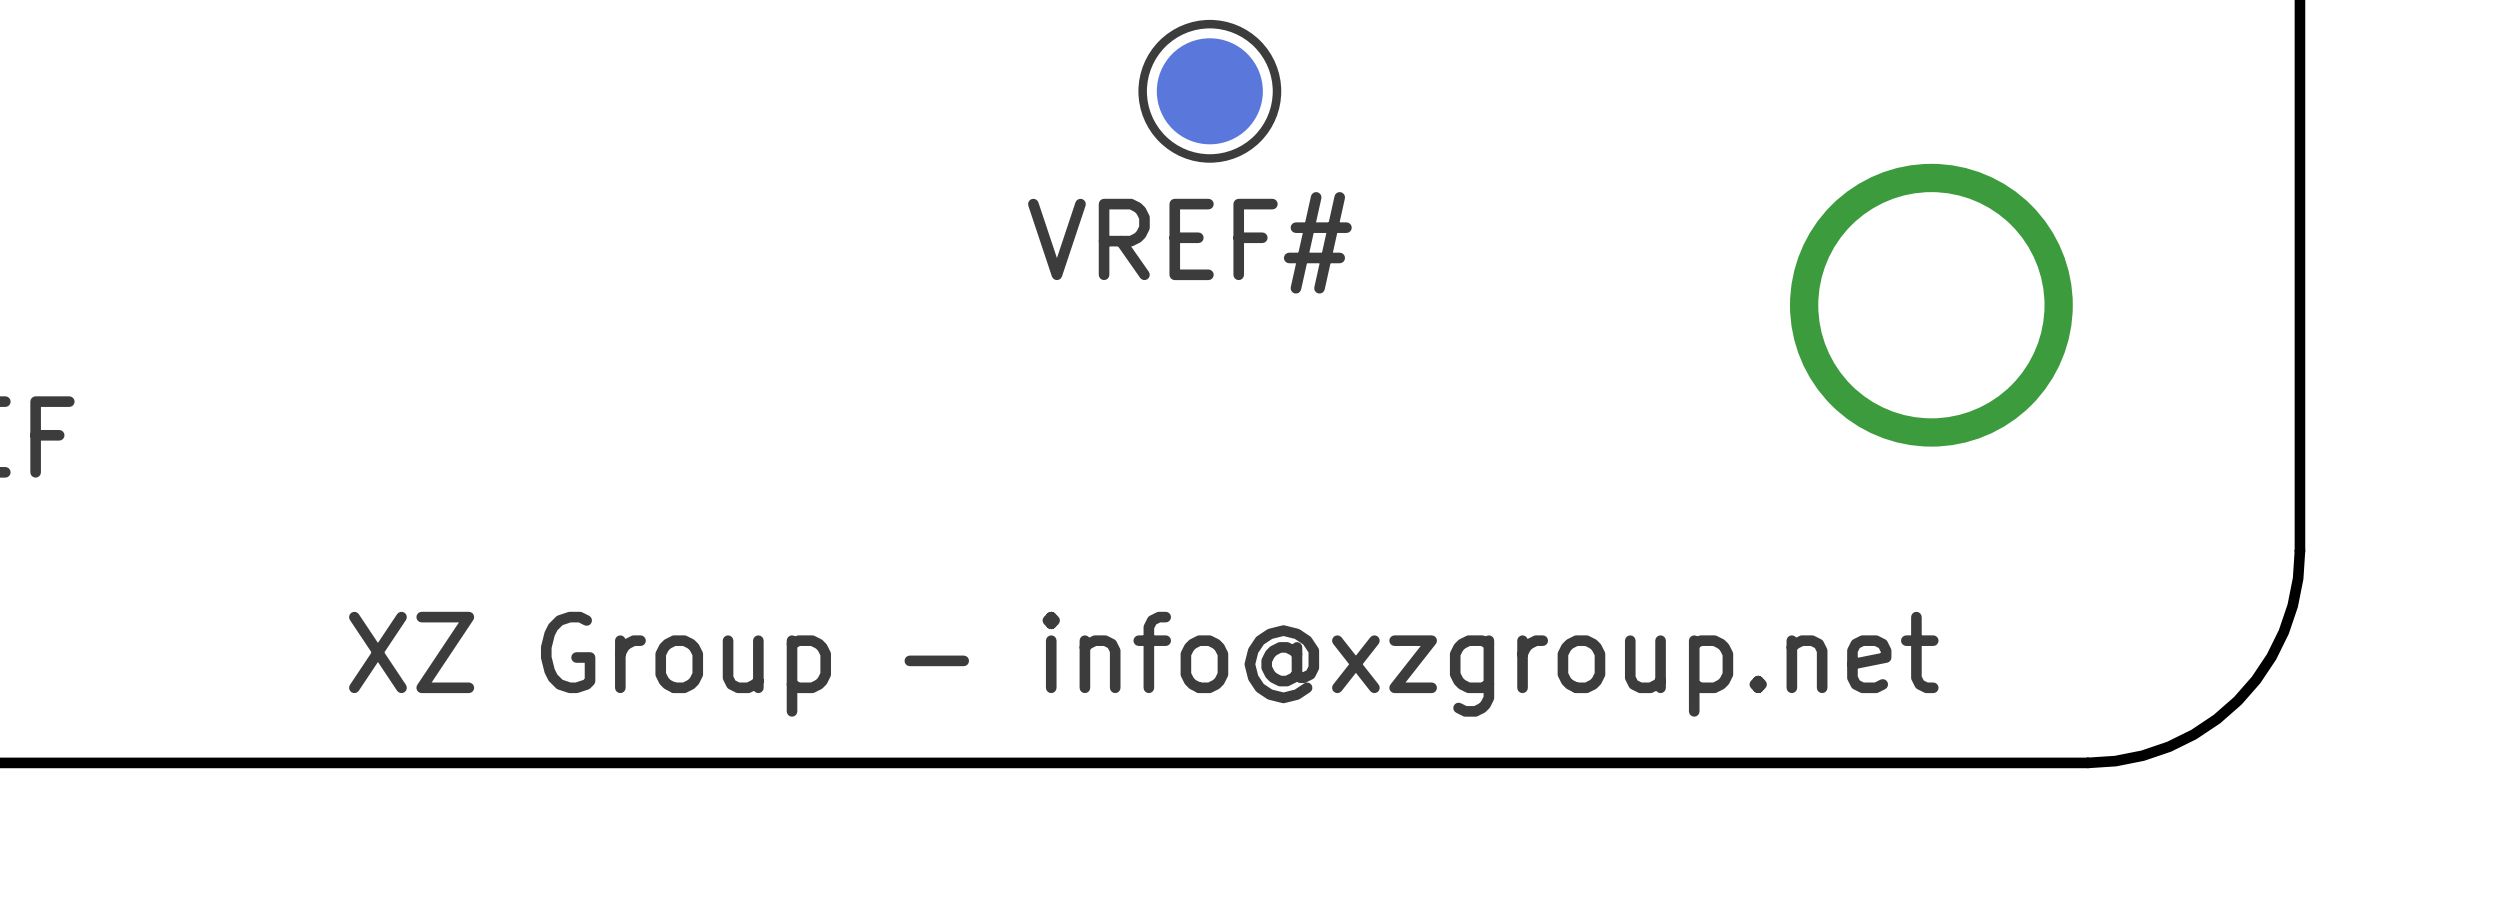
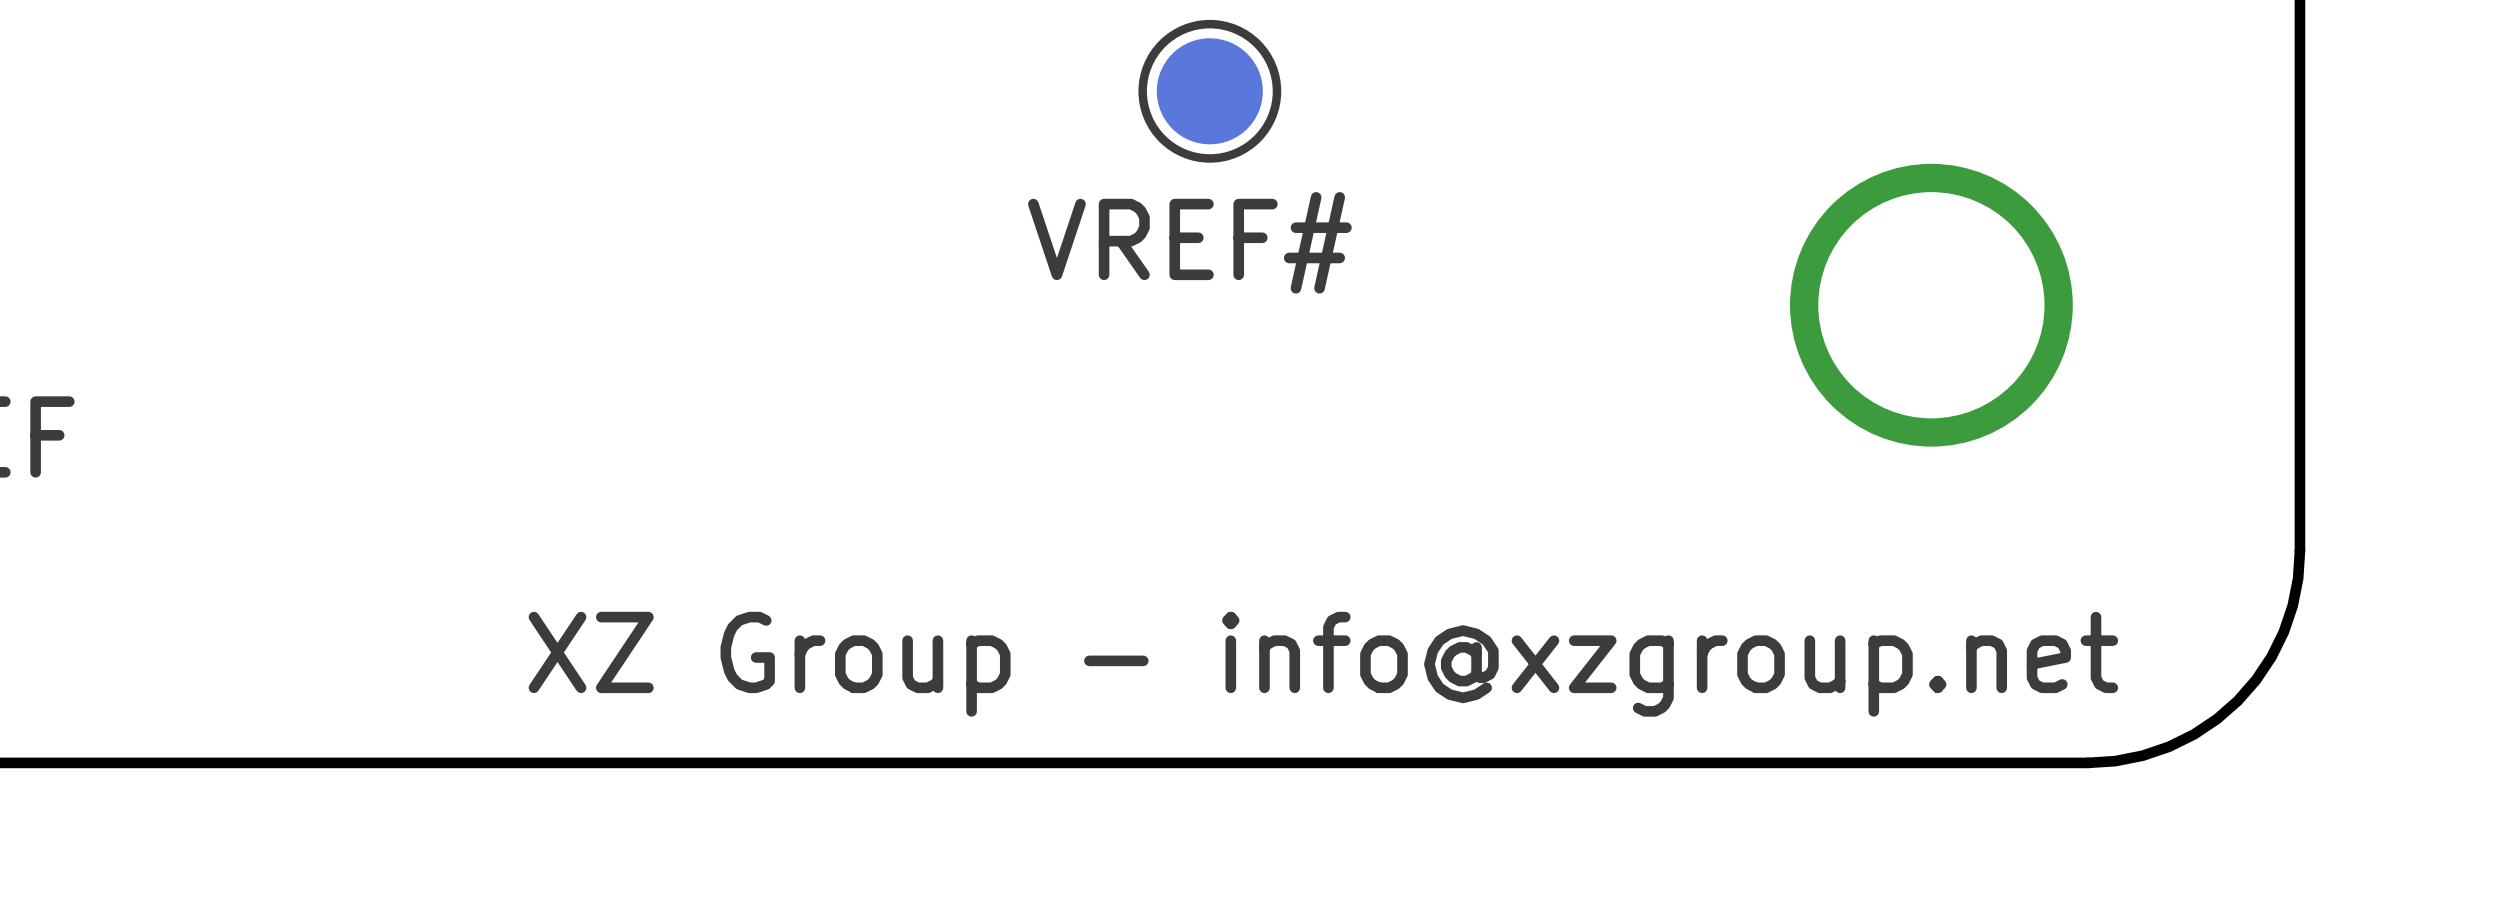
text position: XZ Group - info@xzgroup.net (1143, 664) -> XZ Group - info@xzgroup.net (1323, 664)

